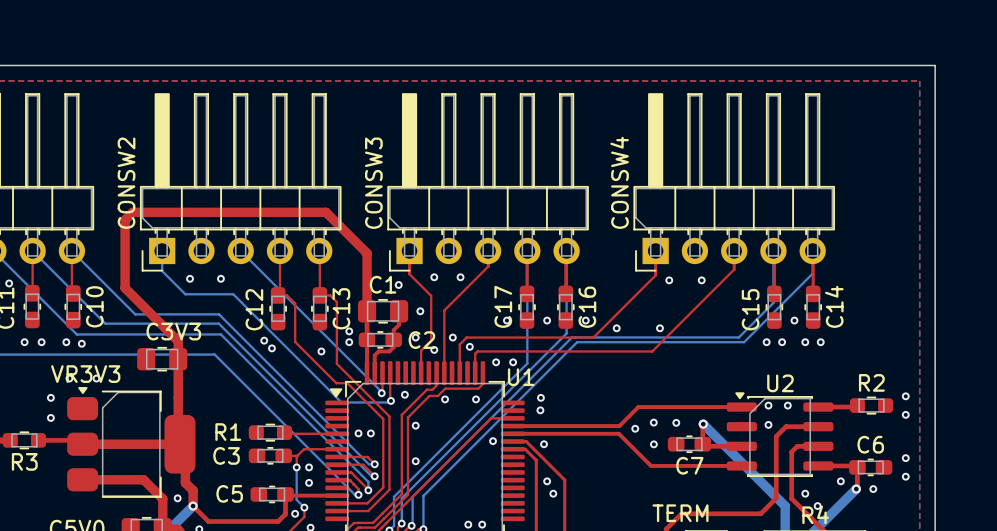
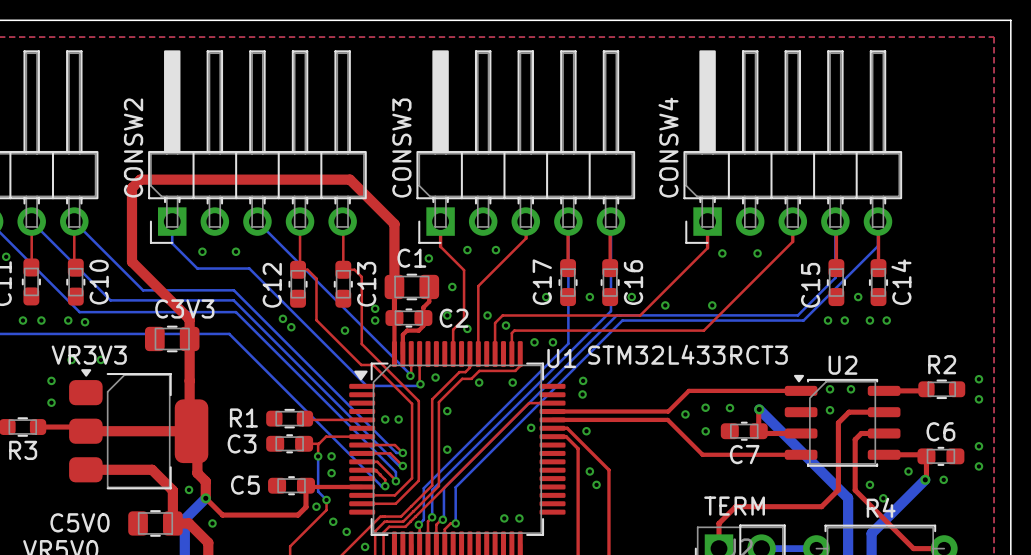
U1 value: none -> STM32L433RCT3 (687, 354)

